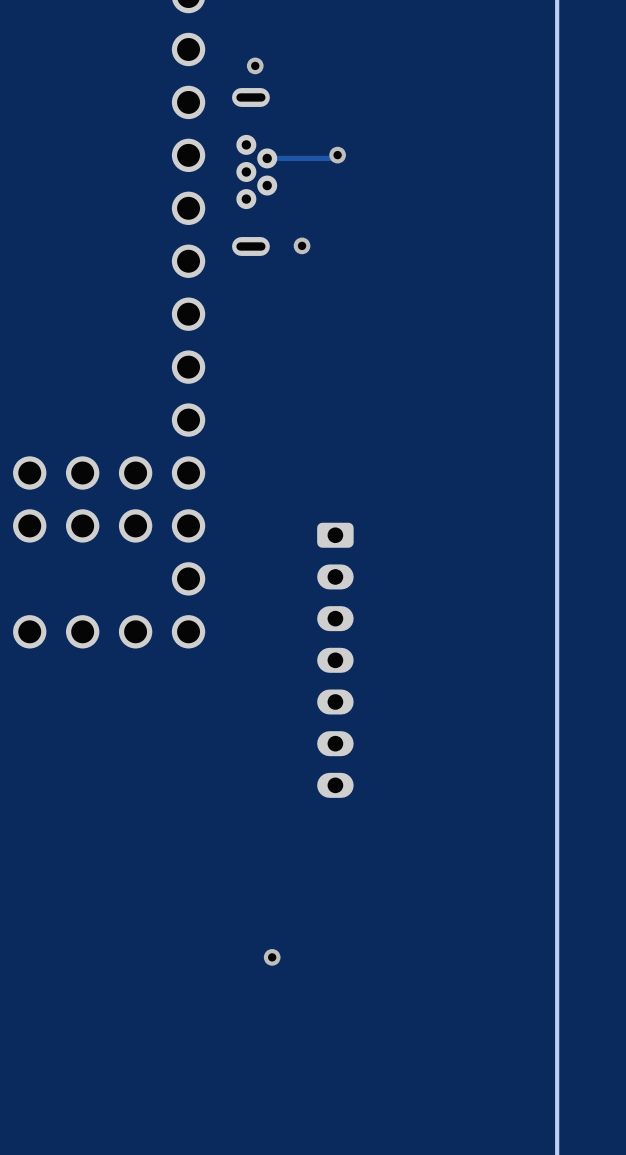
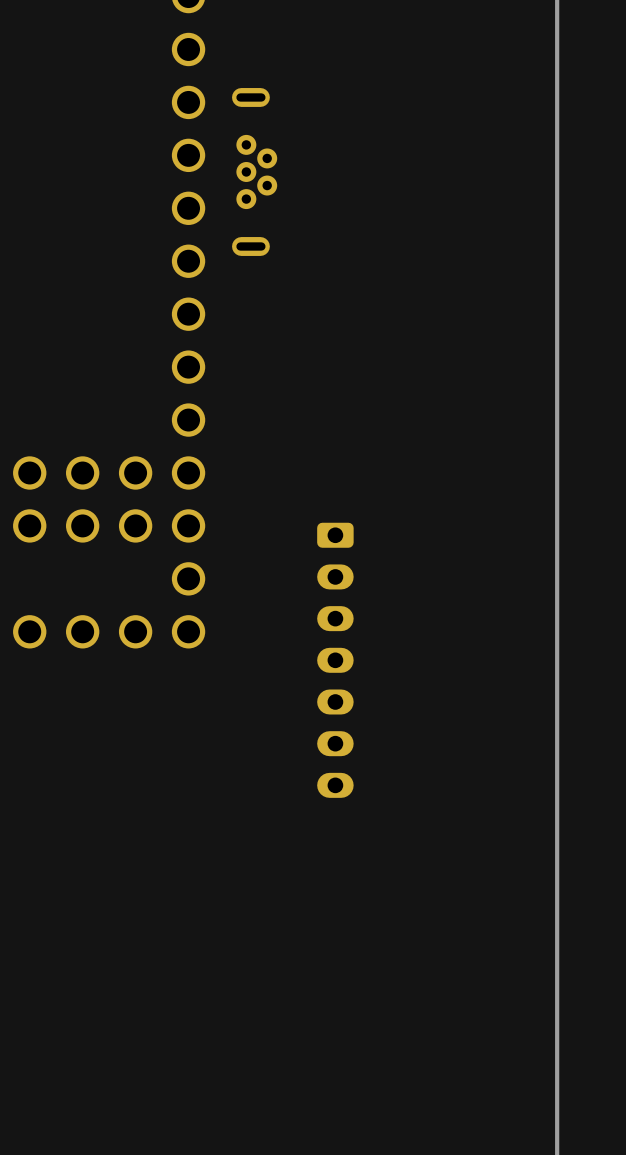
via: (255, 65) -> none
track: (337, 155) (334, 158) (267, 158) -> none
via: (337, 155) -> none
via: (302, 245) -> none
via: (272, 957) -> none

